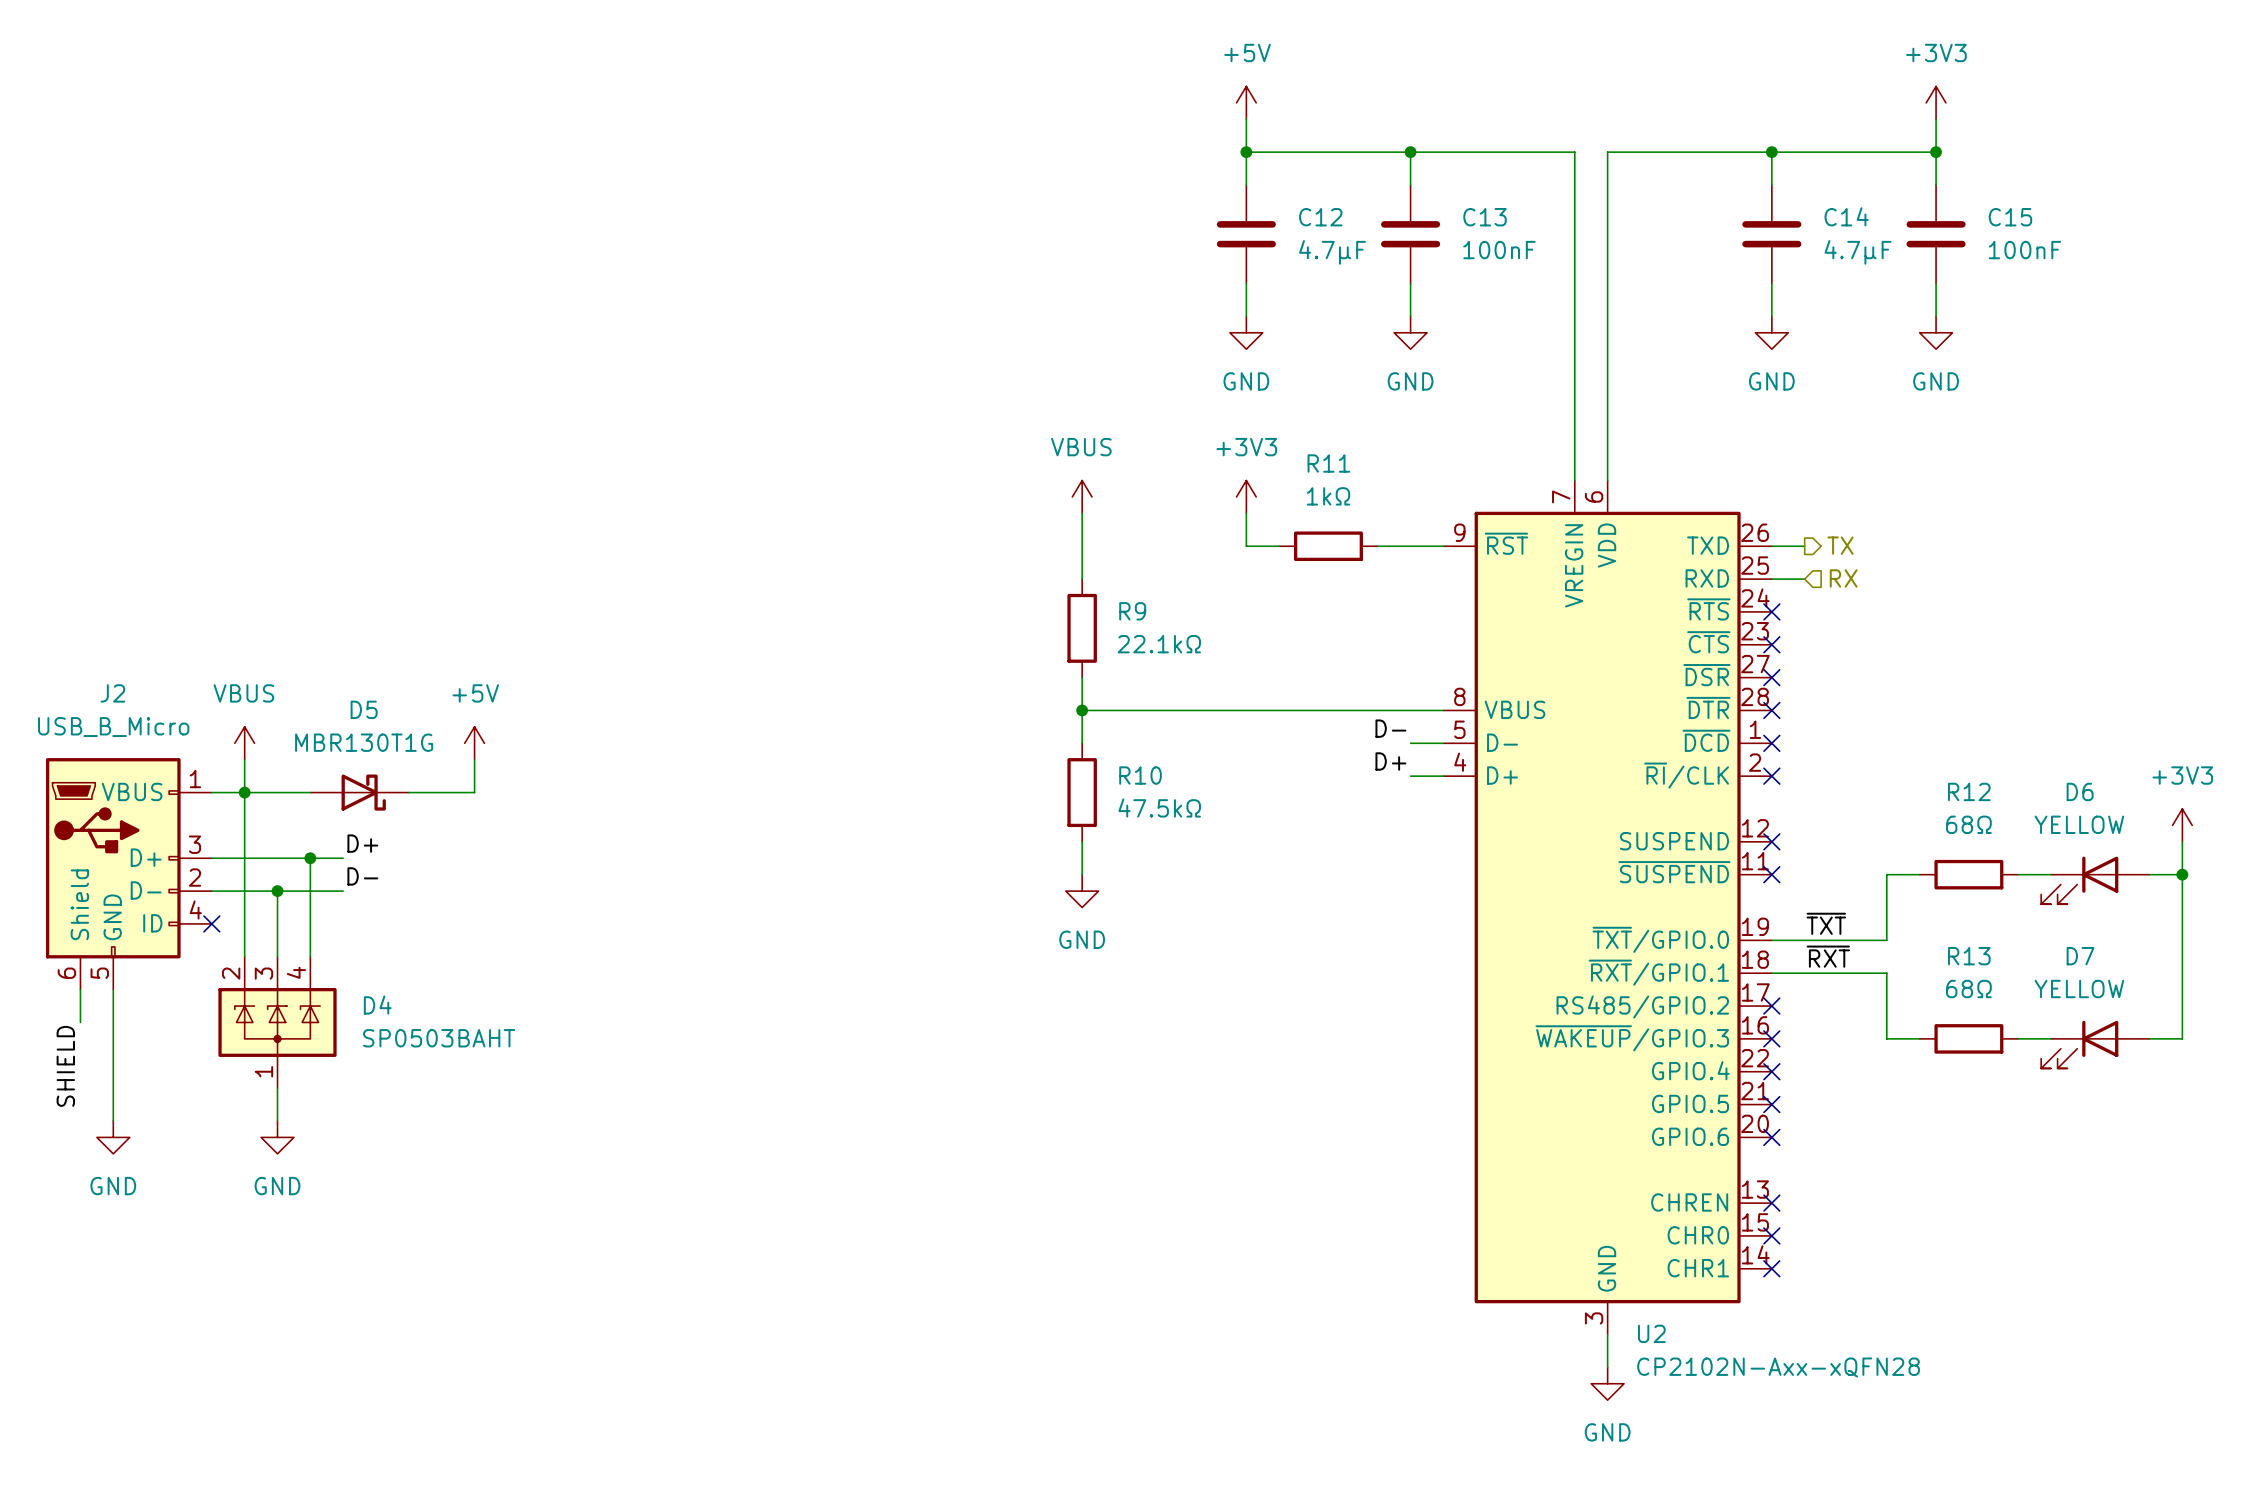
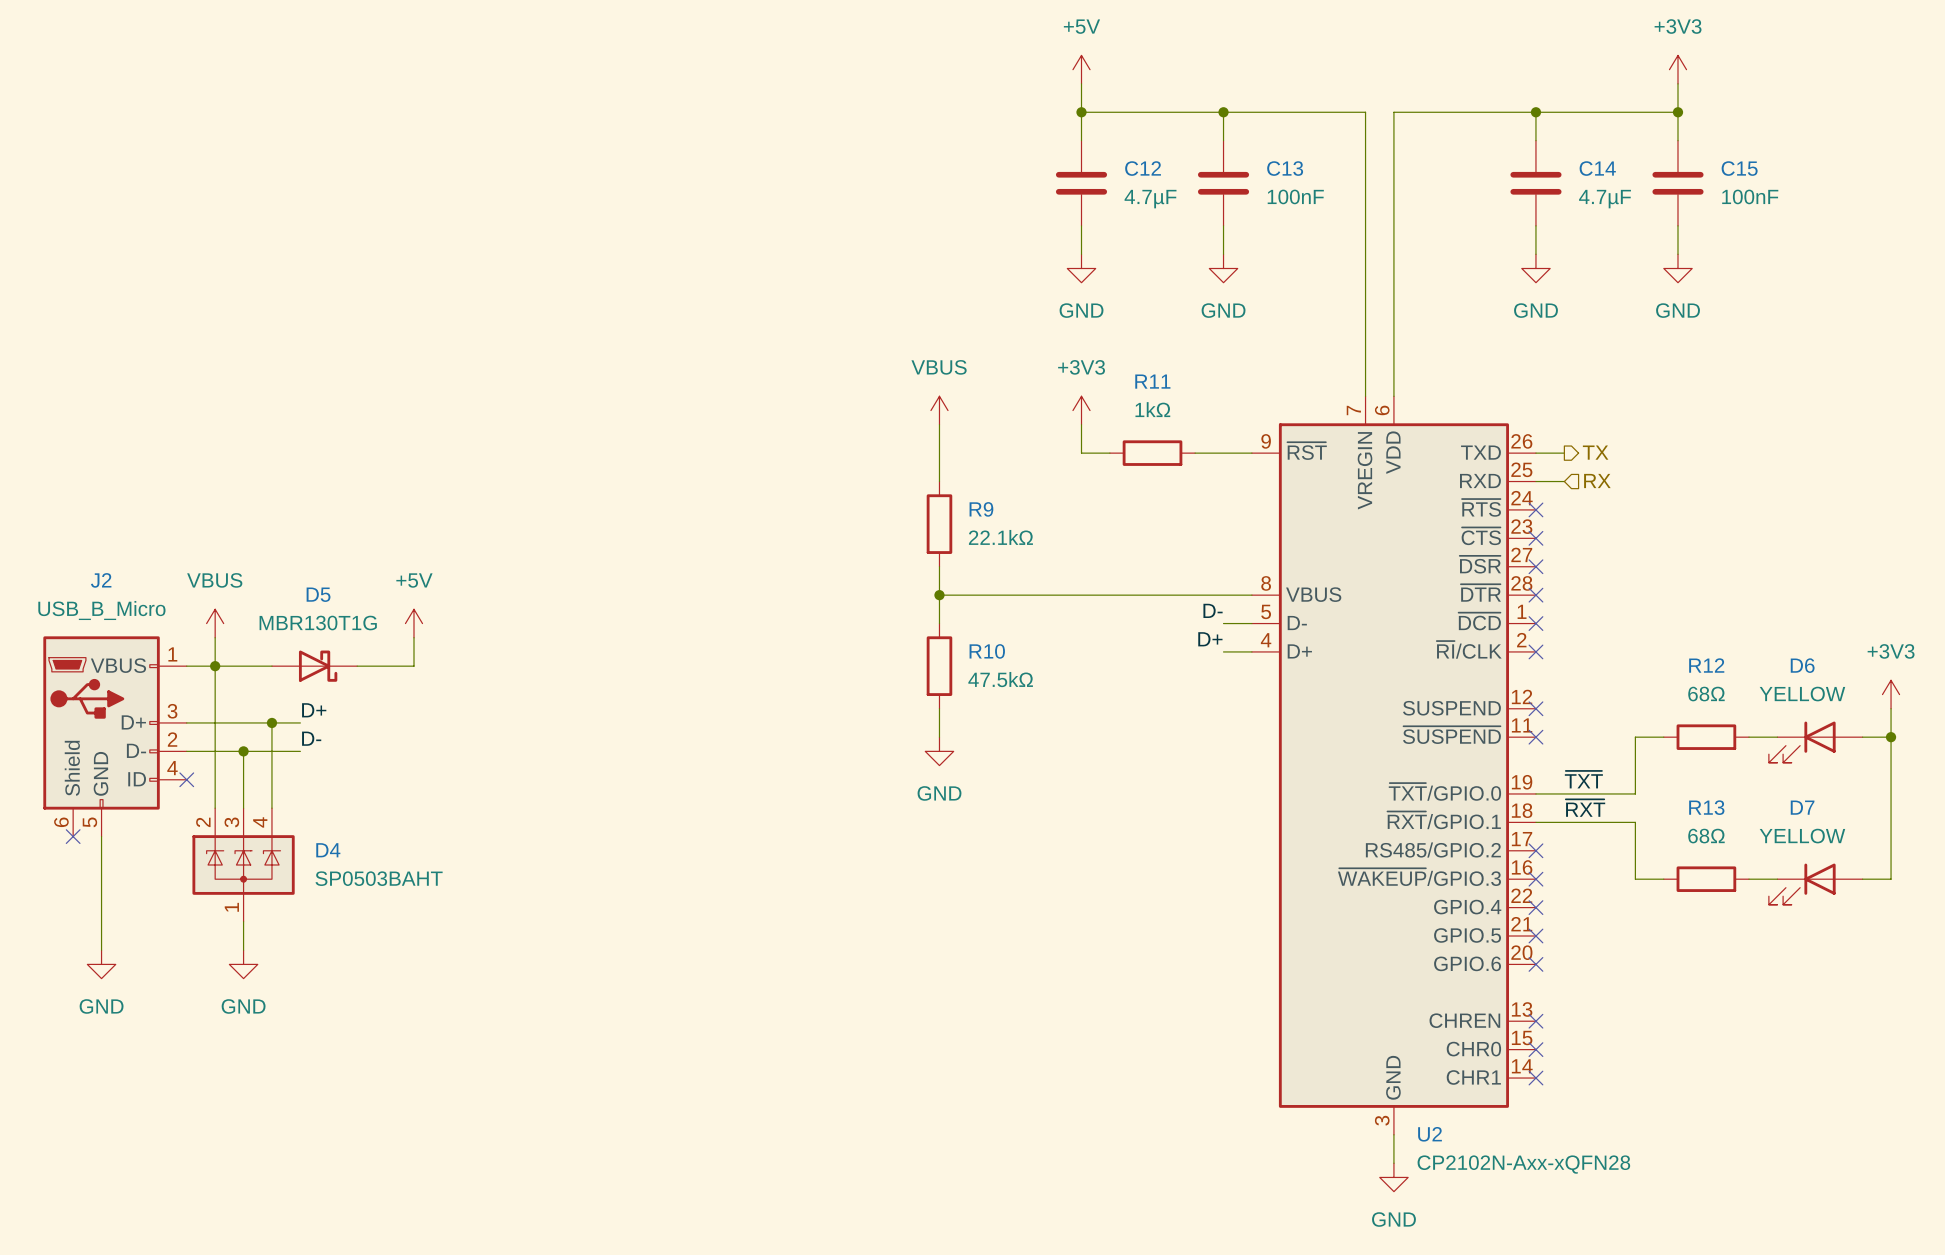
wire: (80, 989) (80, 1022) -> none
no-connect mark: none -> (73, 836)
label: SHIELD (65, 1066) -> none

